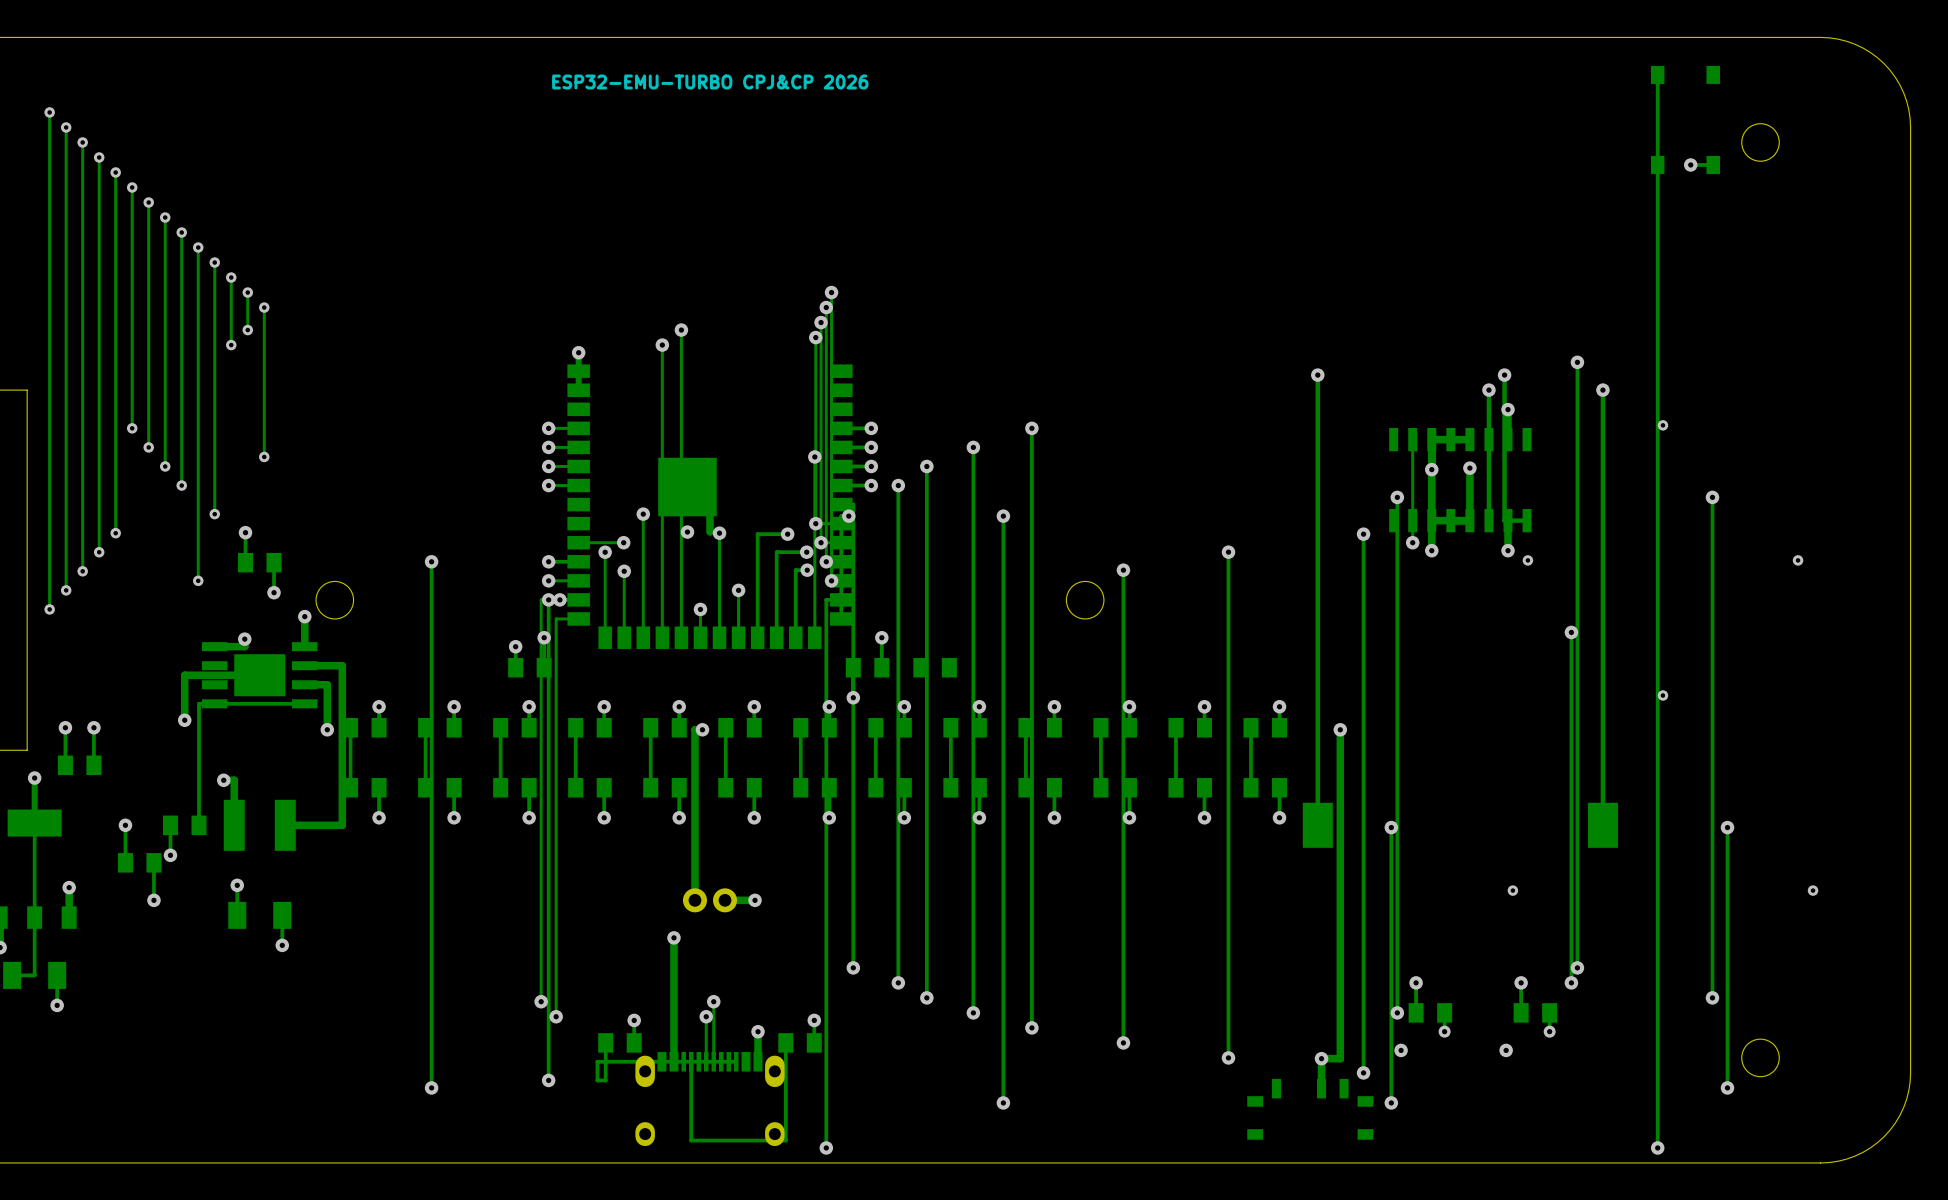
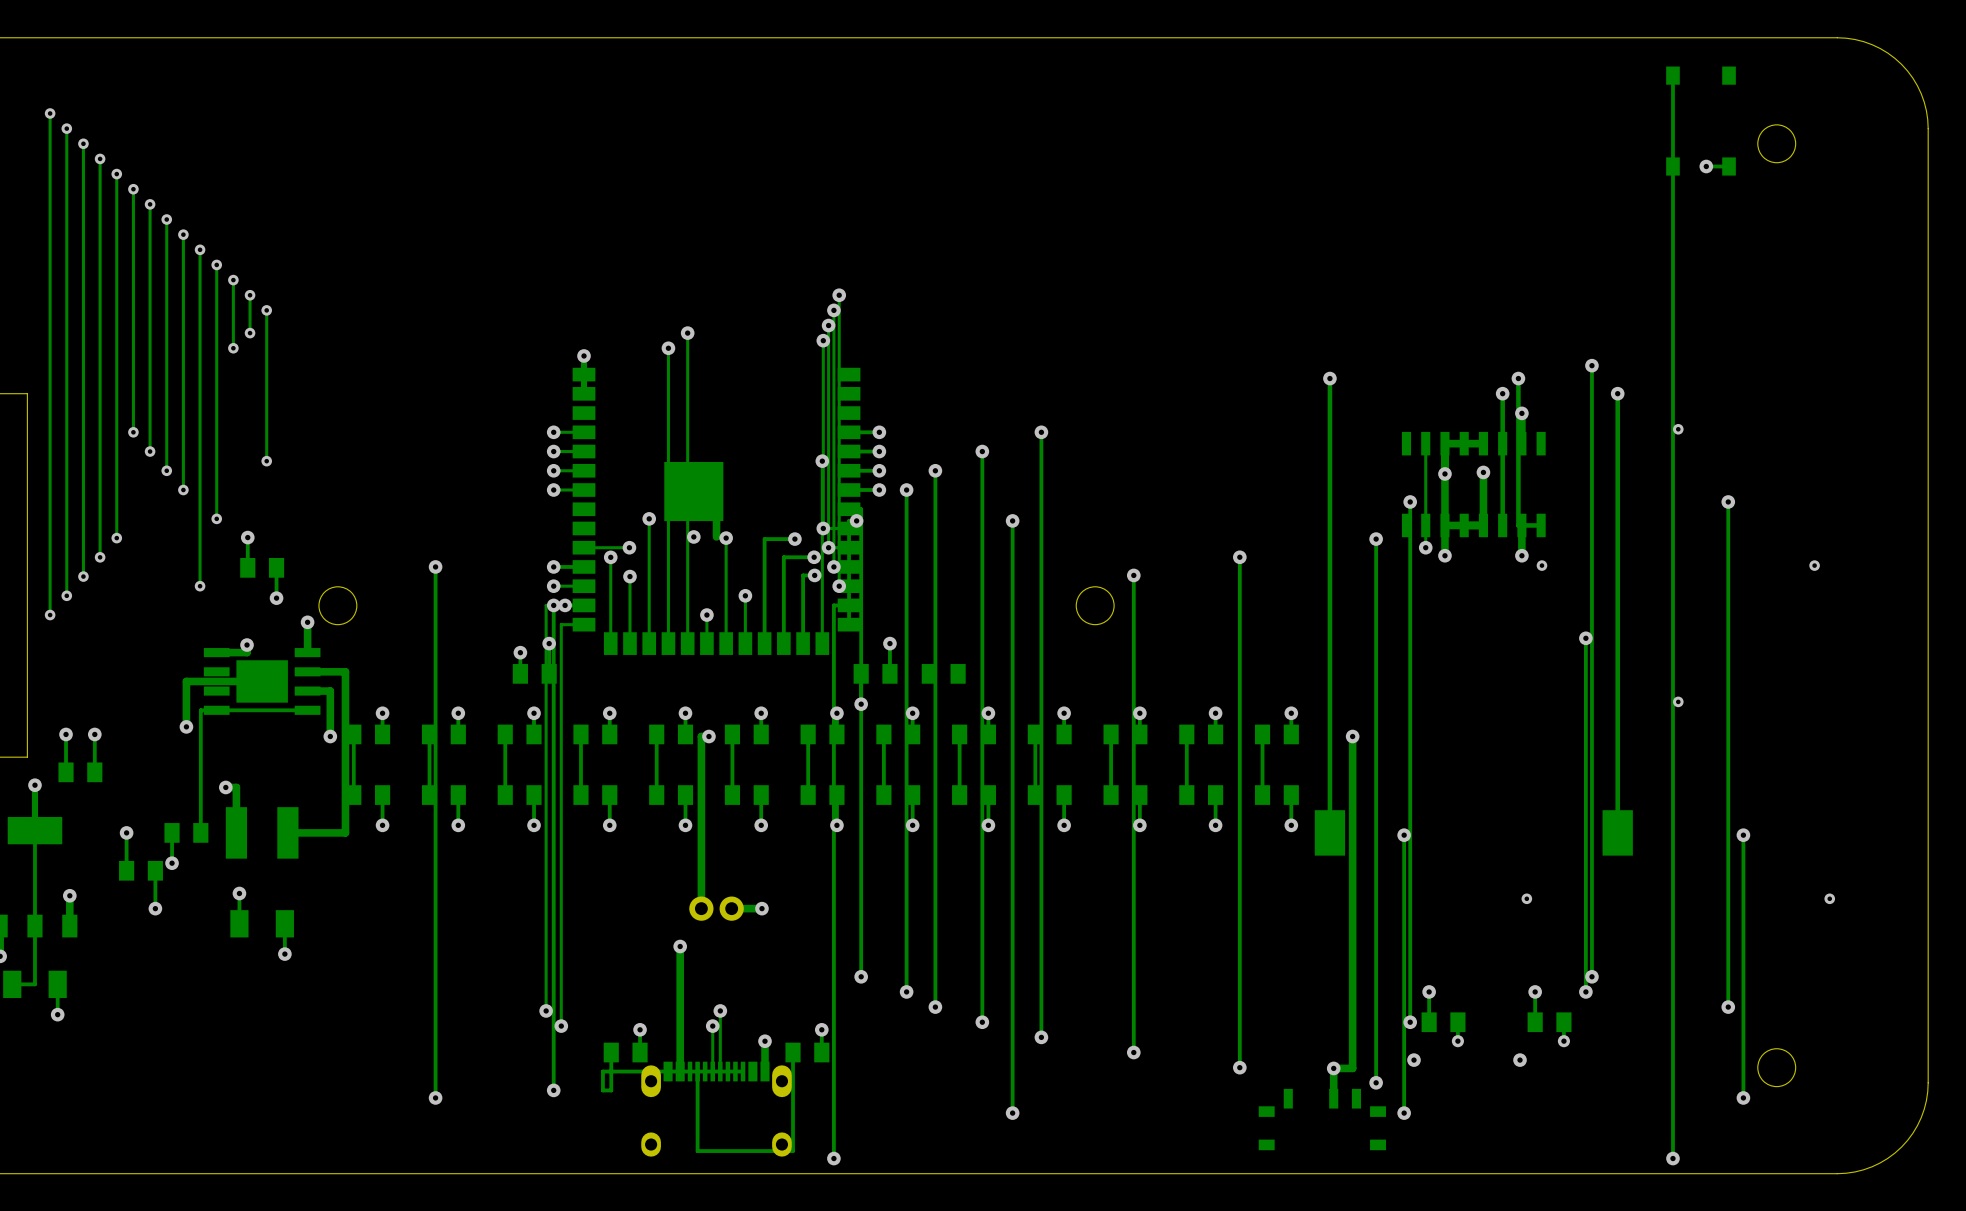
text: ESP32-EMU-TURBO CPJ&CP 2026 (710, 81) -> none

